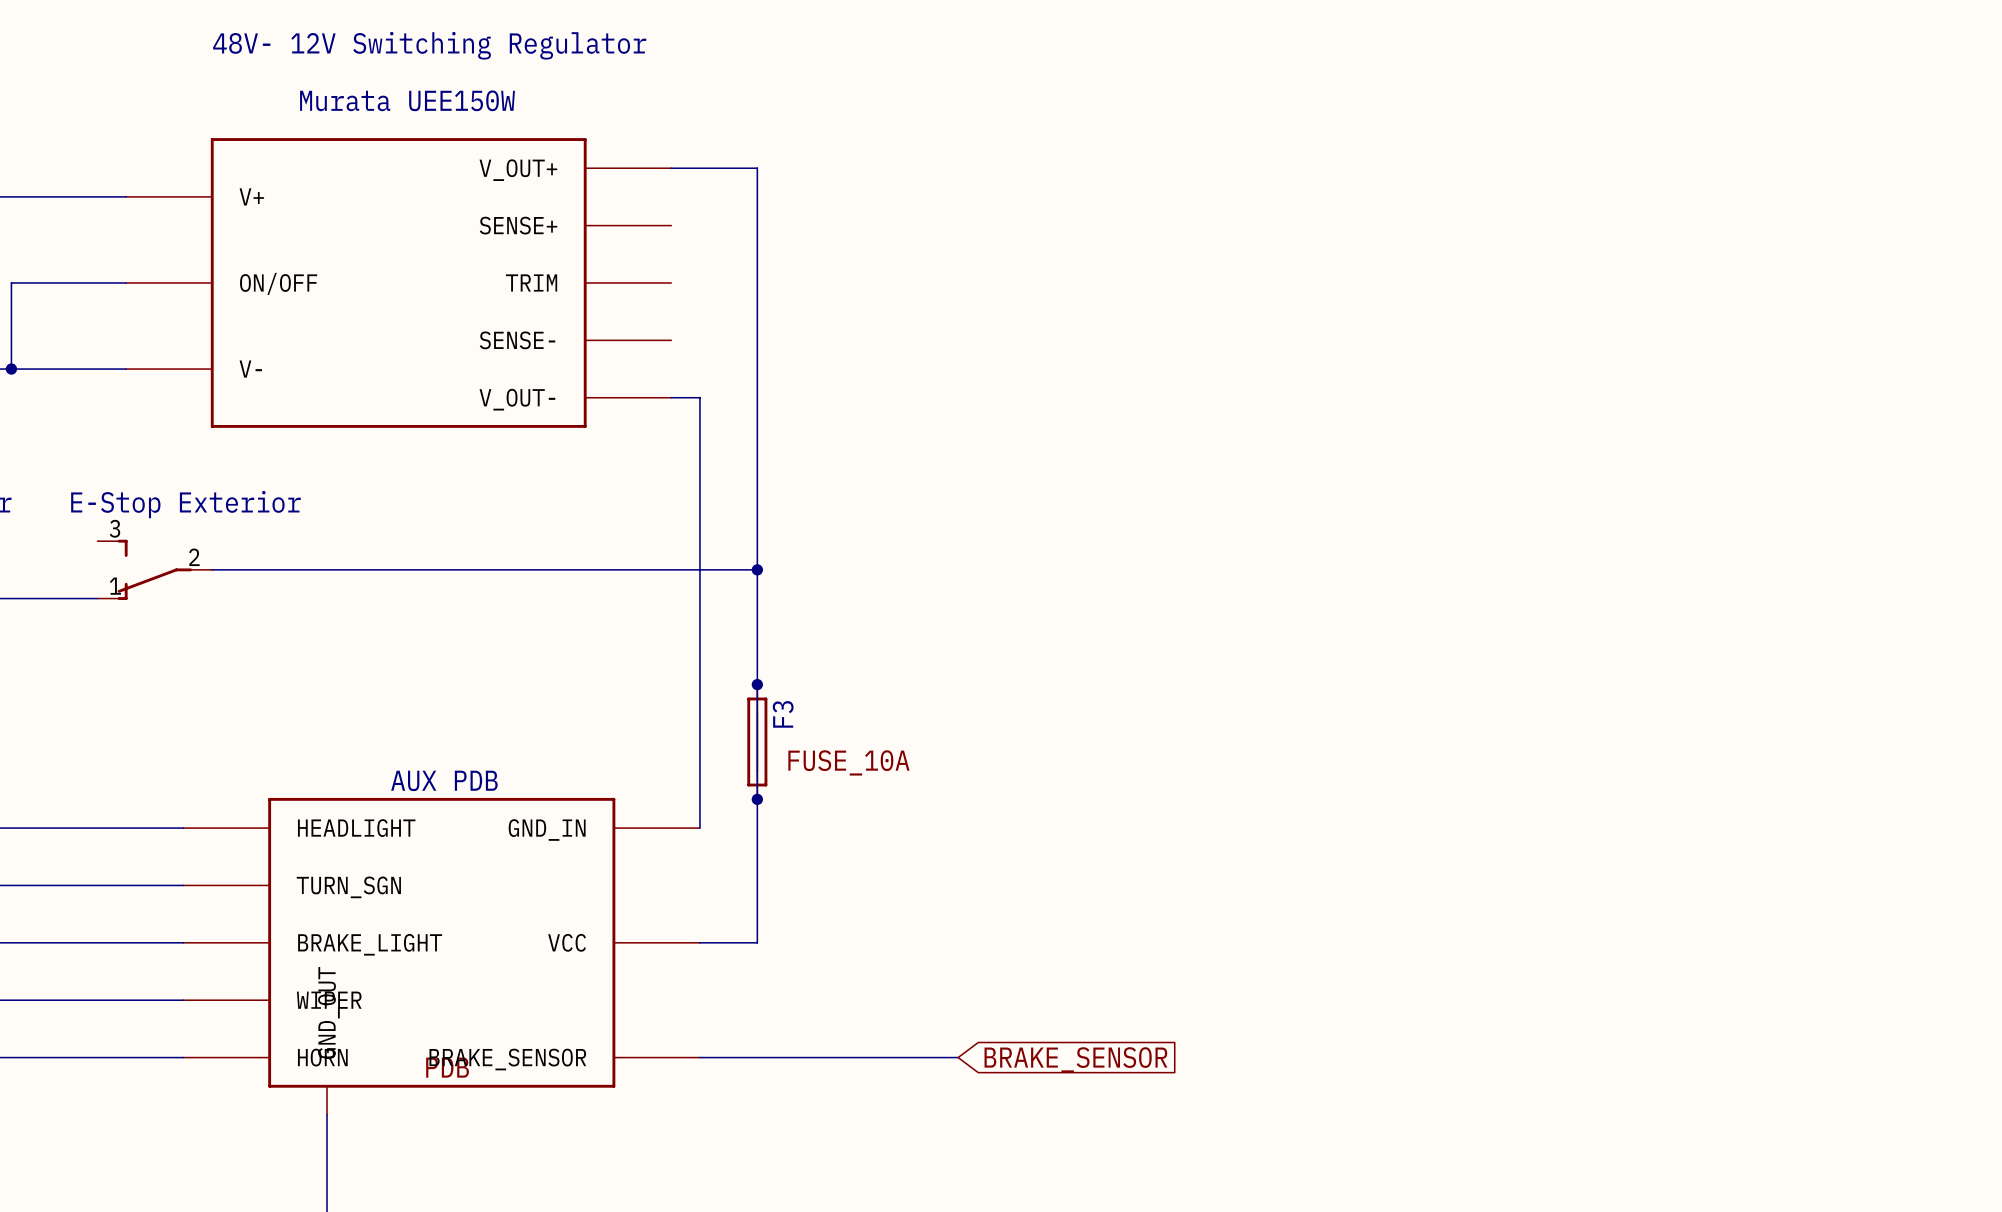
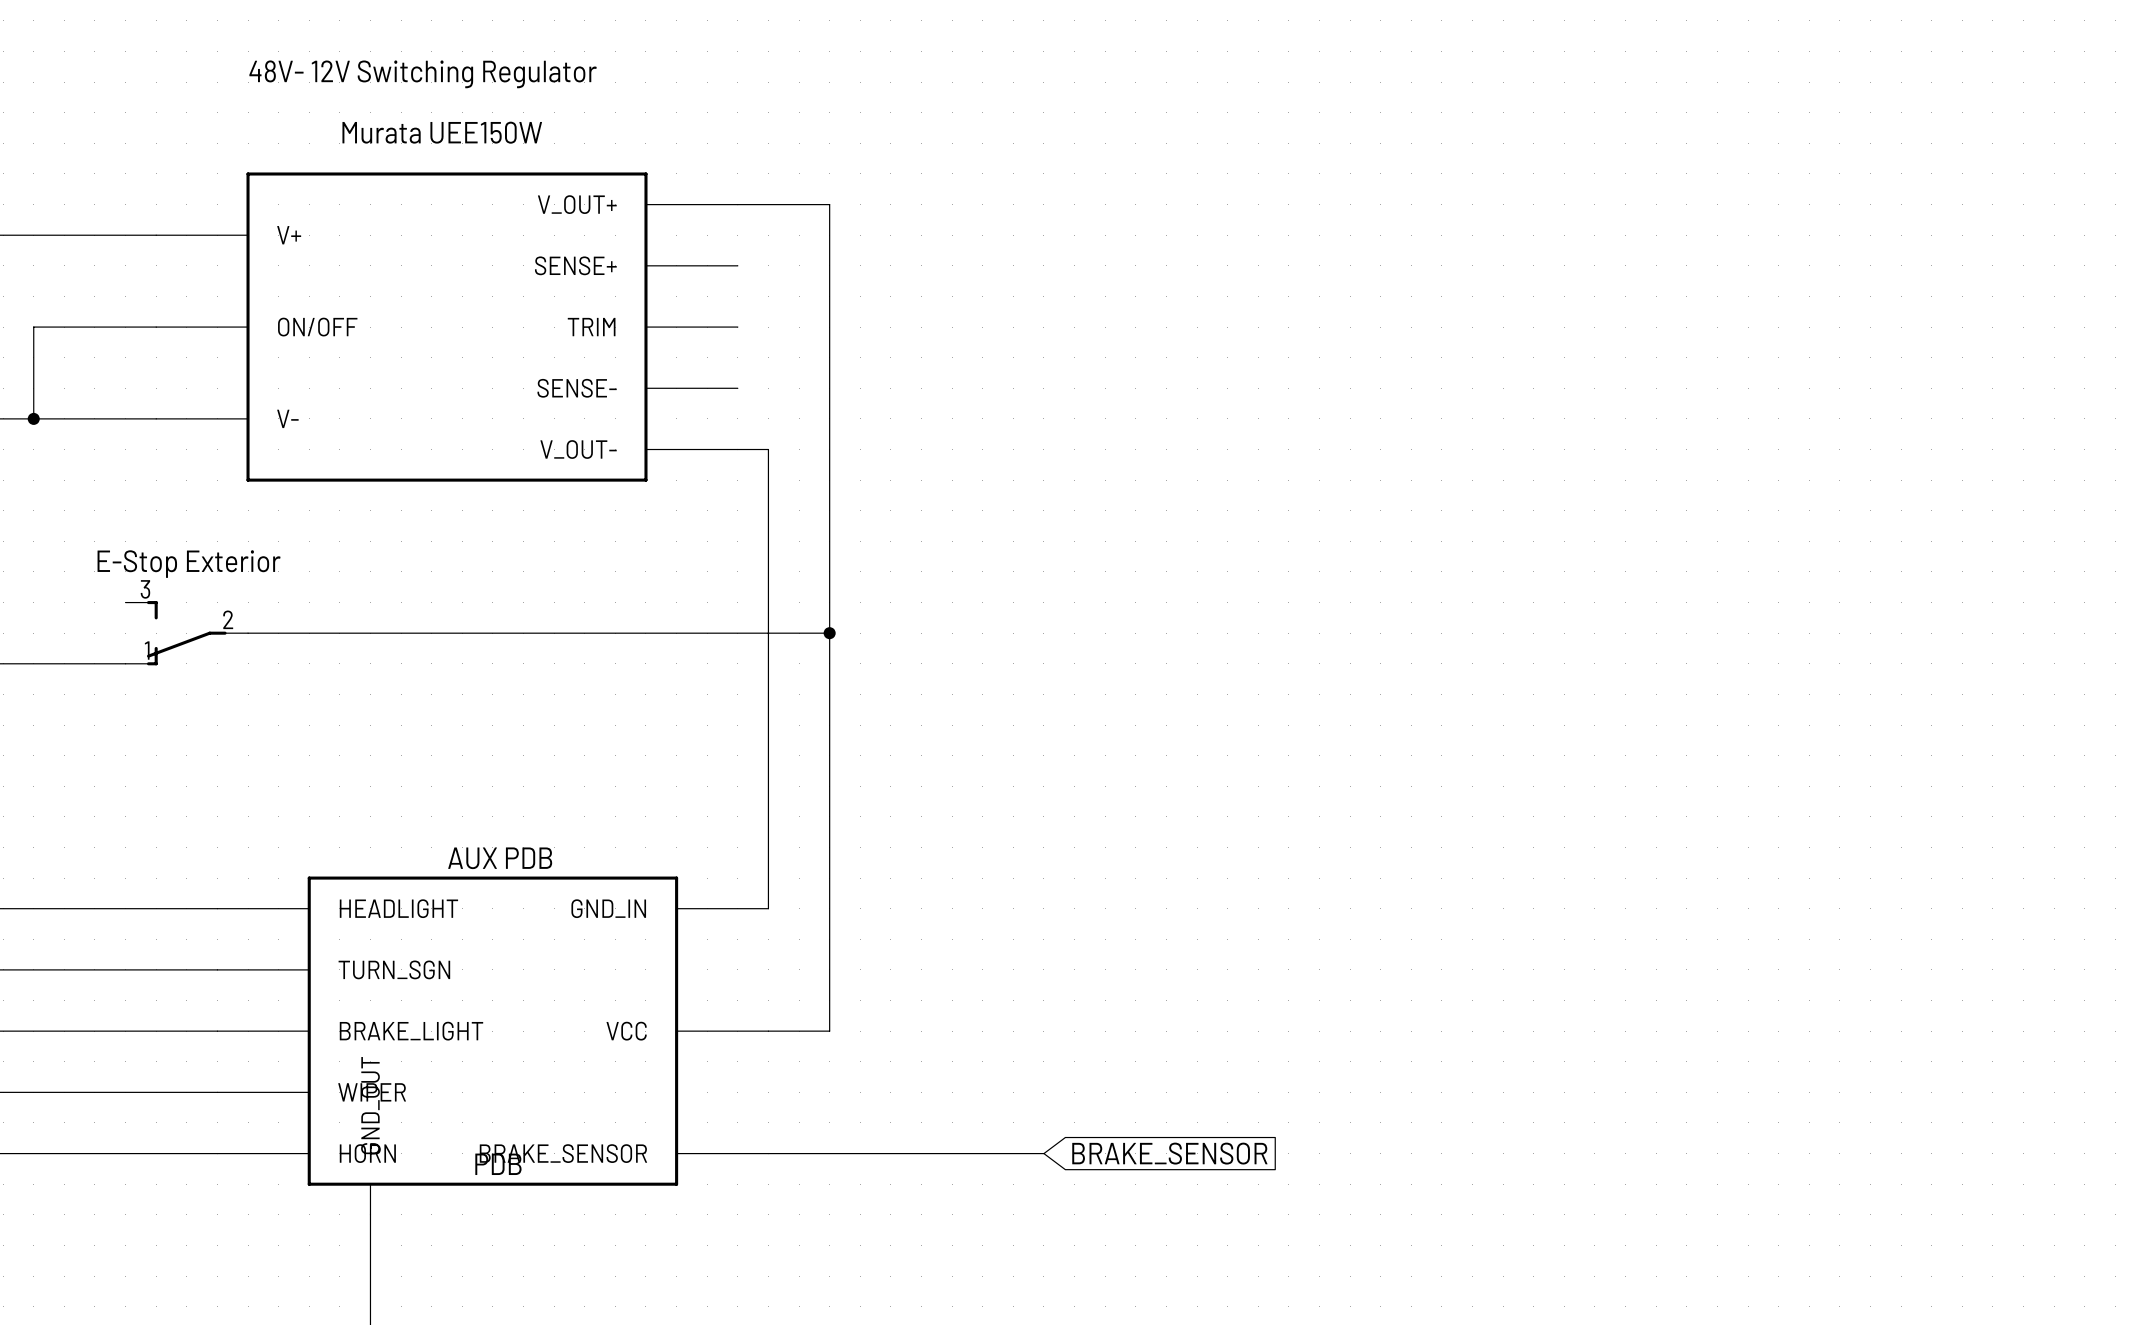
junction: (757, 684) -> none
F3: (757, 742) -> none
label: FUSE_10A (848, 762) -> none
junction: (757, 799) -> none

